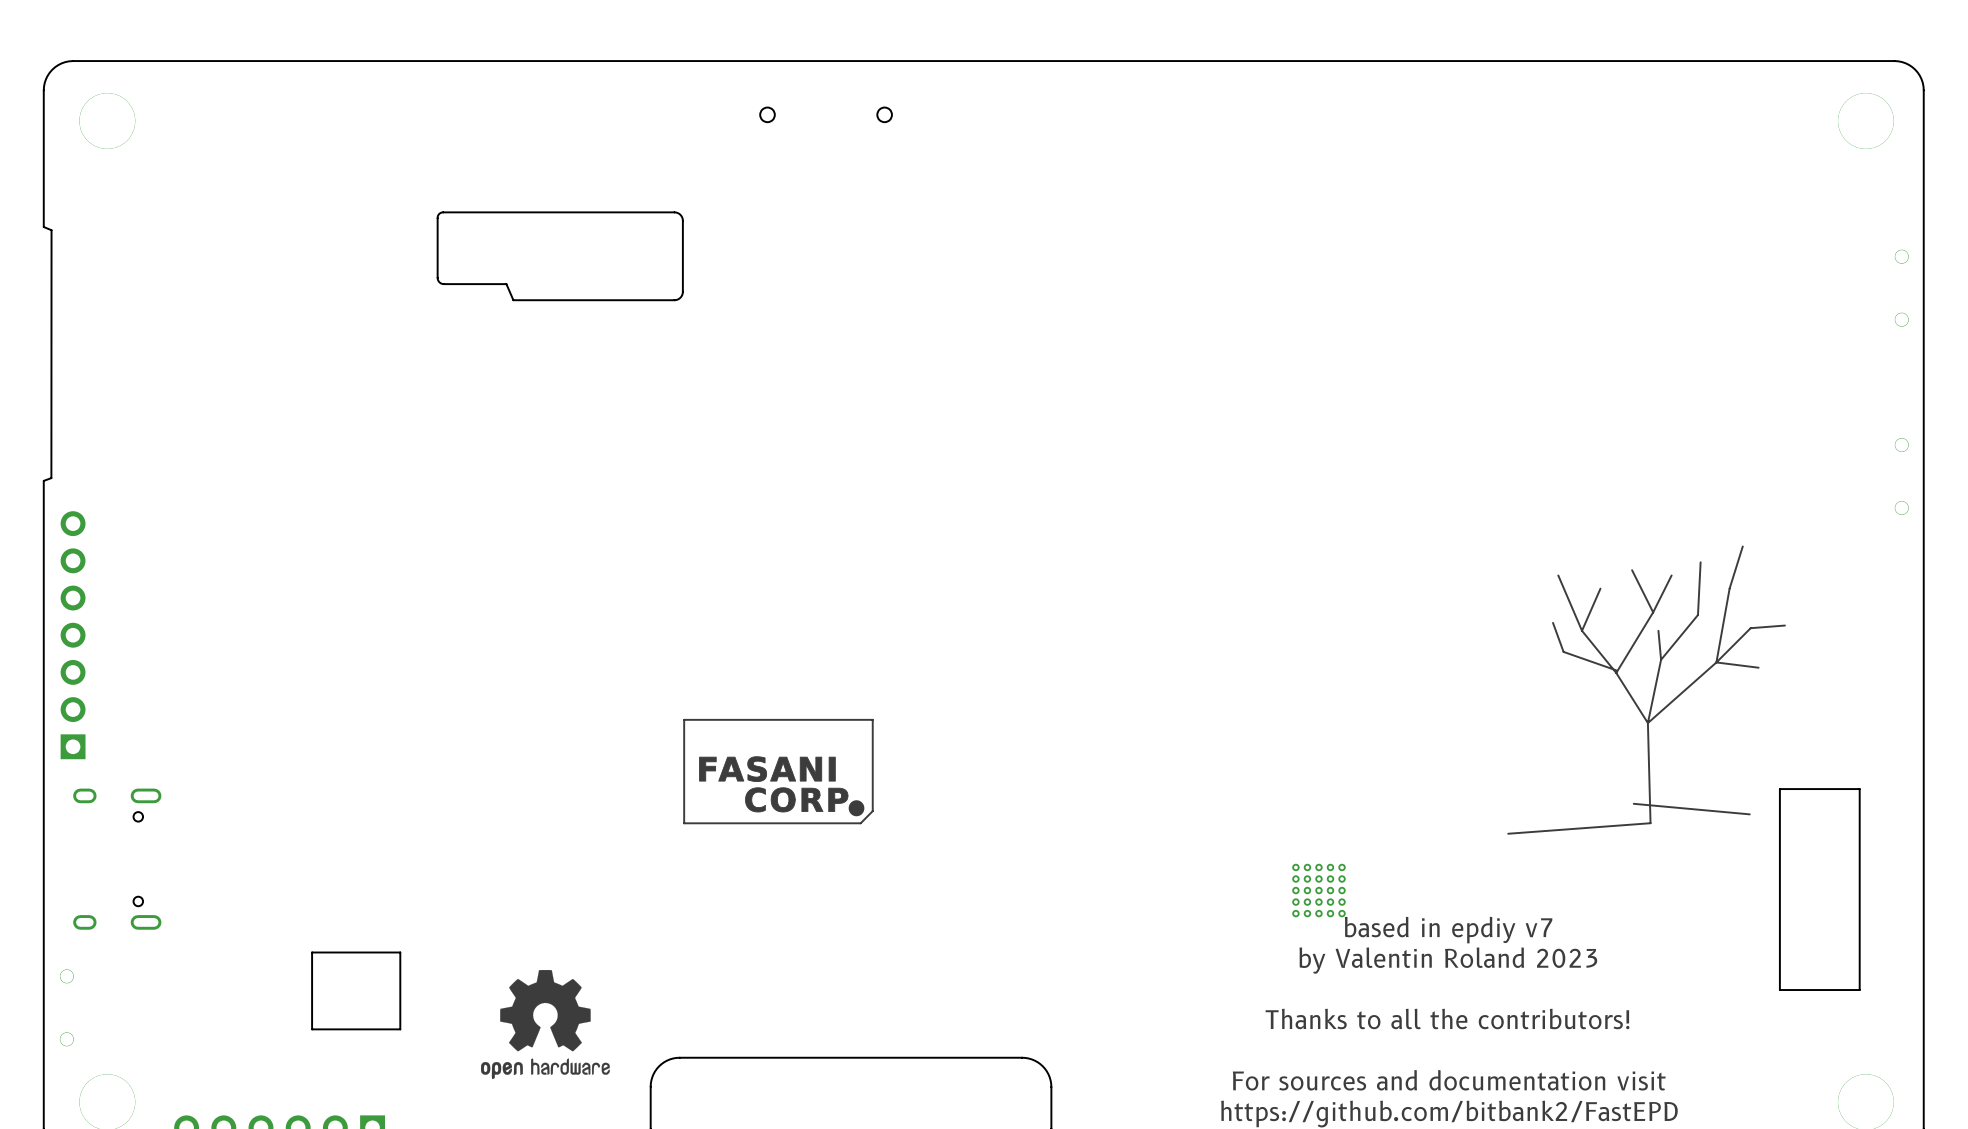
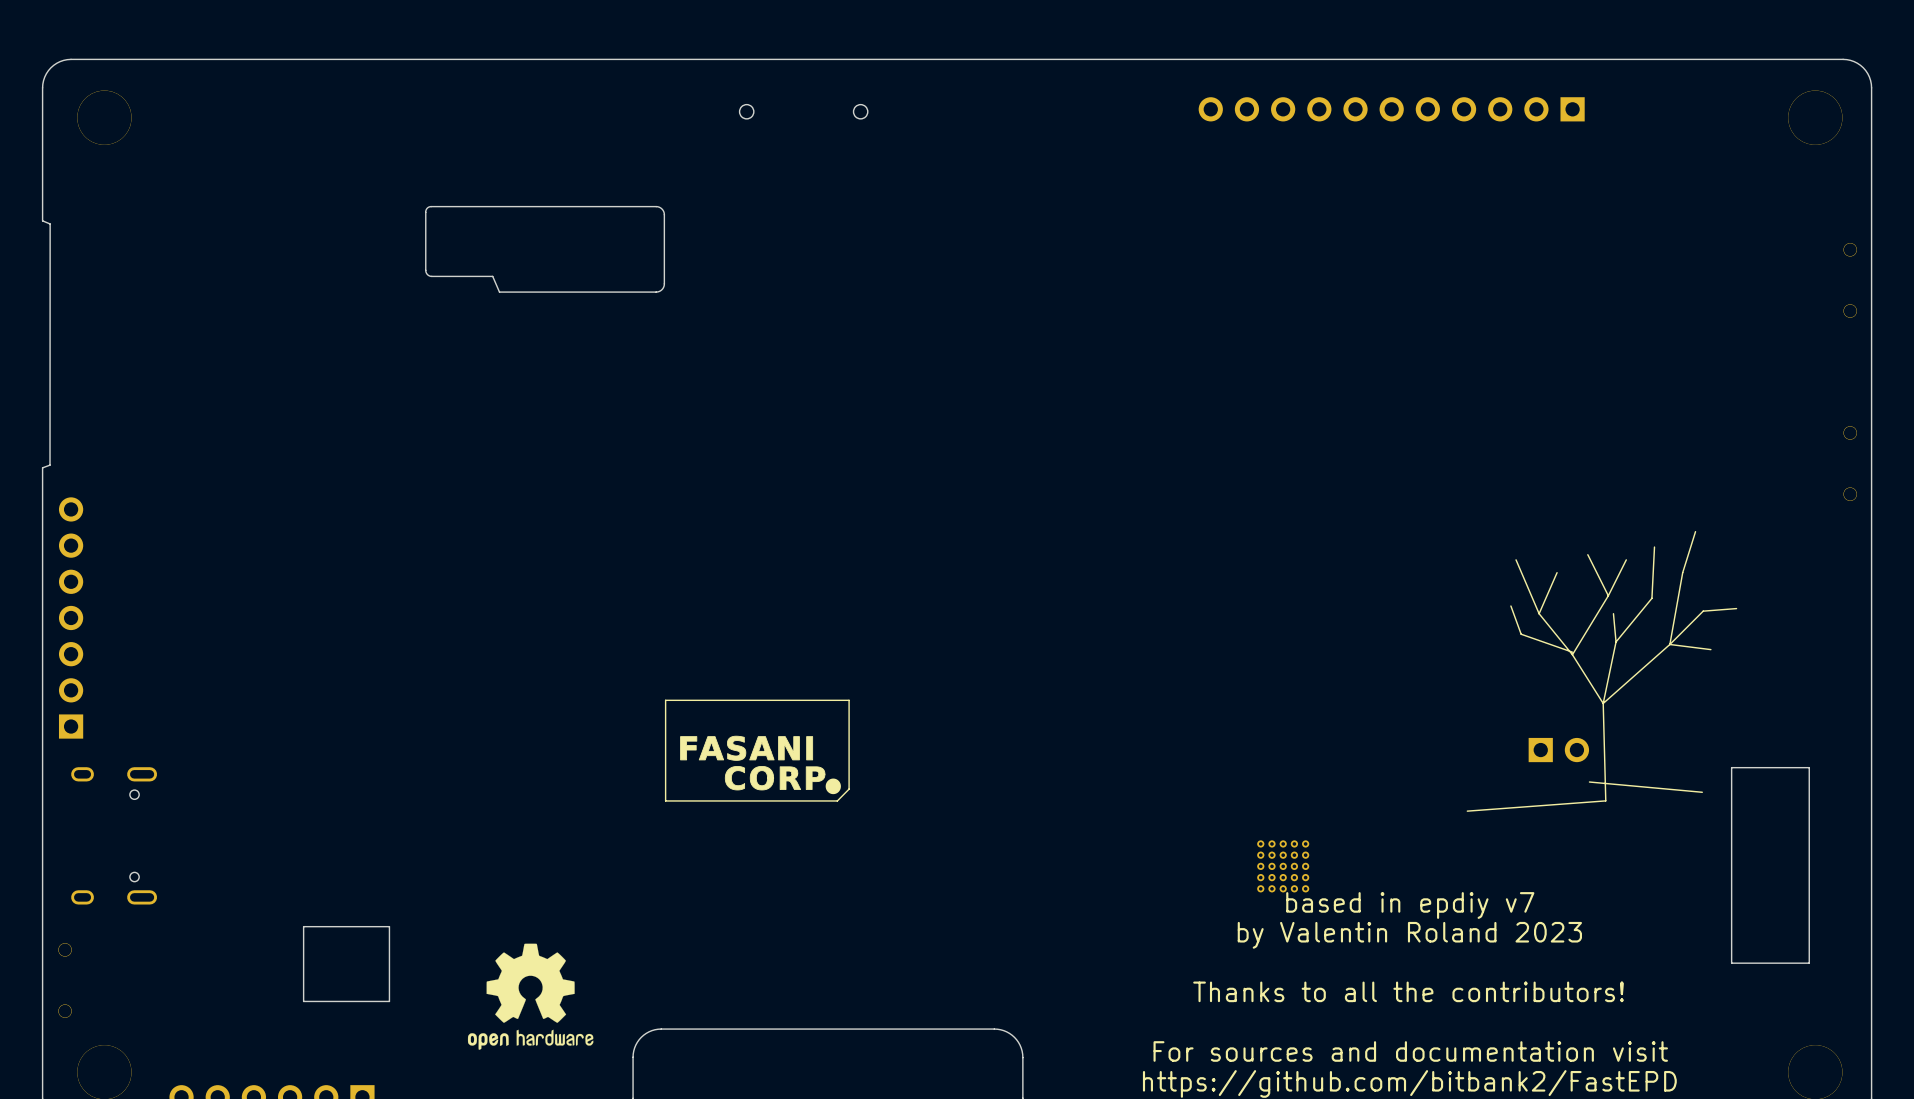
part: none -> (1391, 109)
part: none -> (1558, 750)

